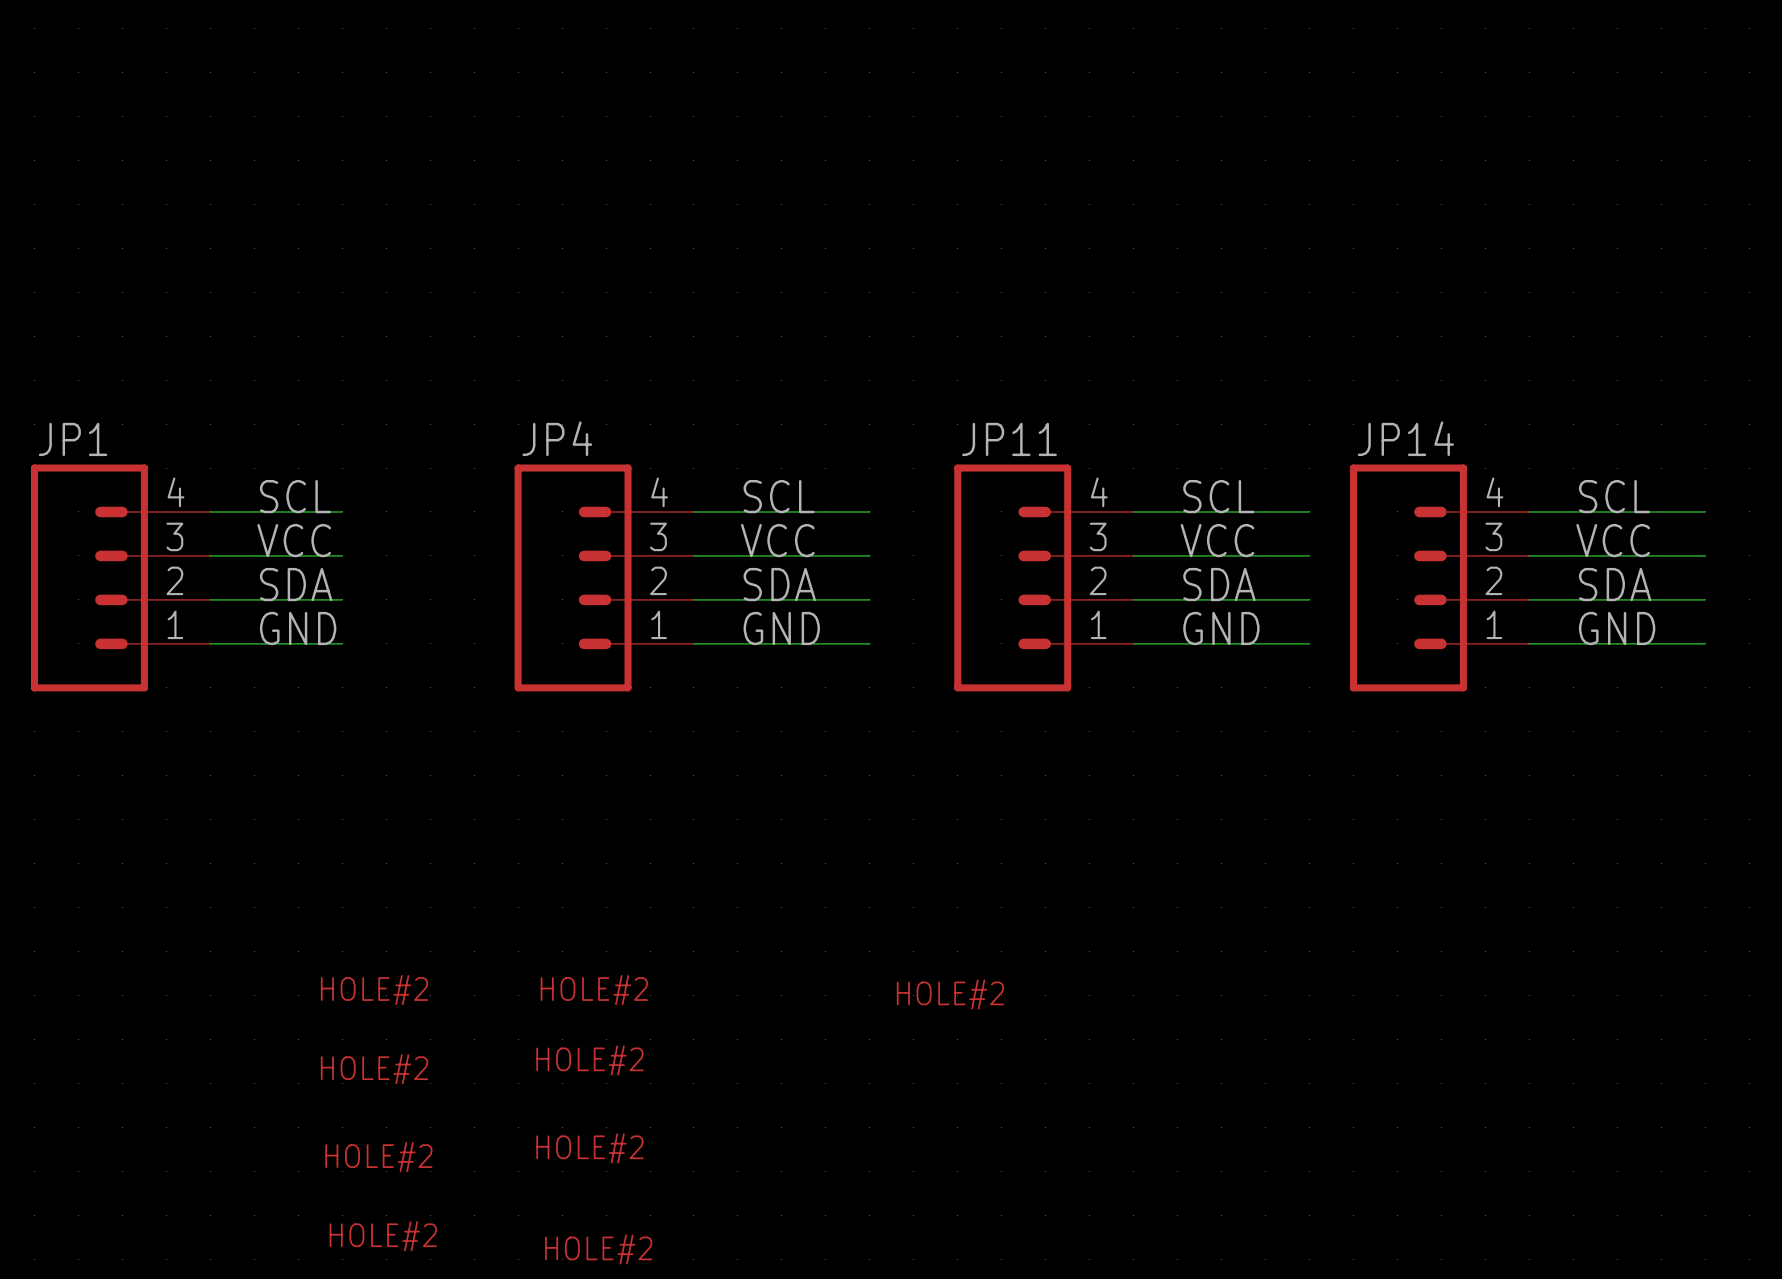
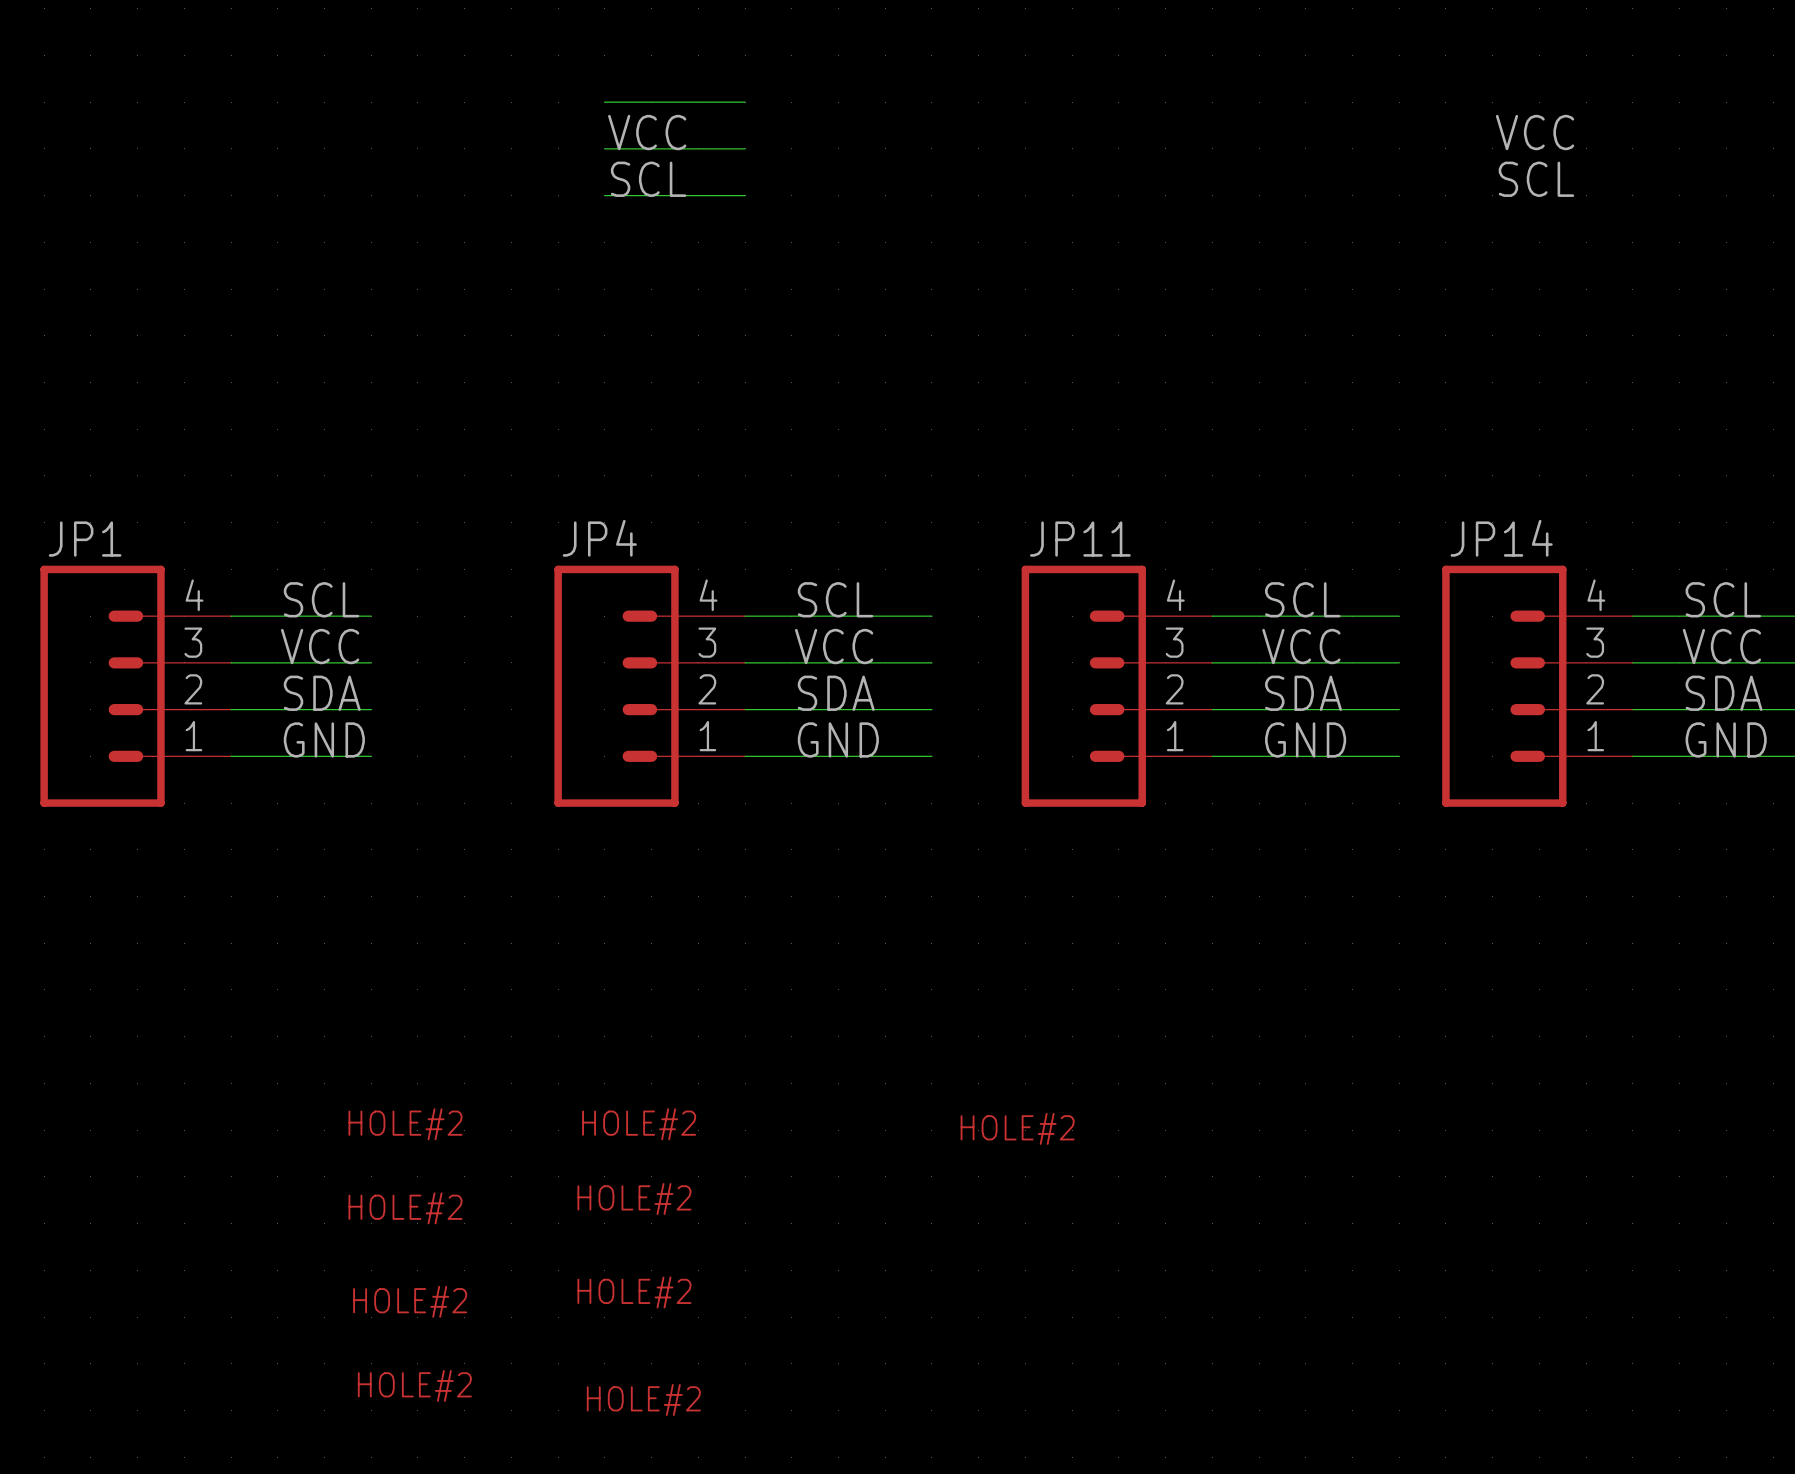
wire: none -> (604, 102) (745, 102)
label: none -> VCC (647, 132)
label: none -> VCC (1535, 132)
wire: none -> (604, 148) (745, 148)
label: none -> SCL (648, 179)
label: none -> SCL (1536, 179)
wire: none -> (604, 195) (745, 195)

